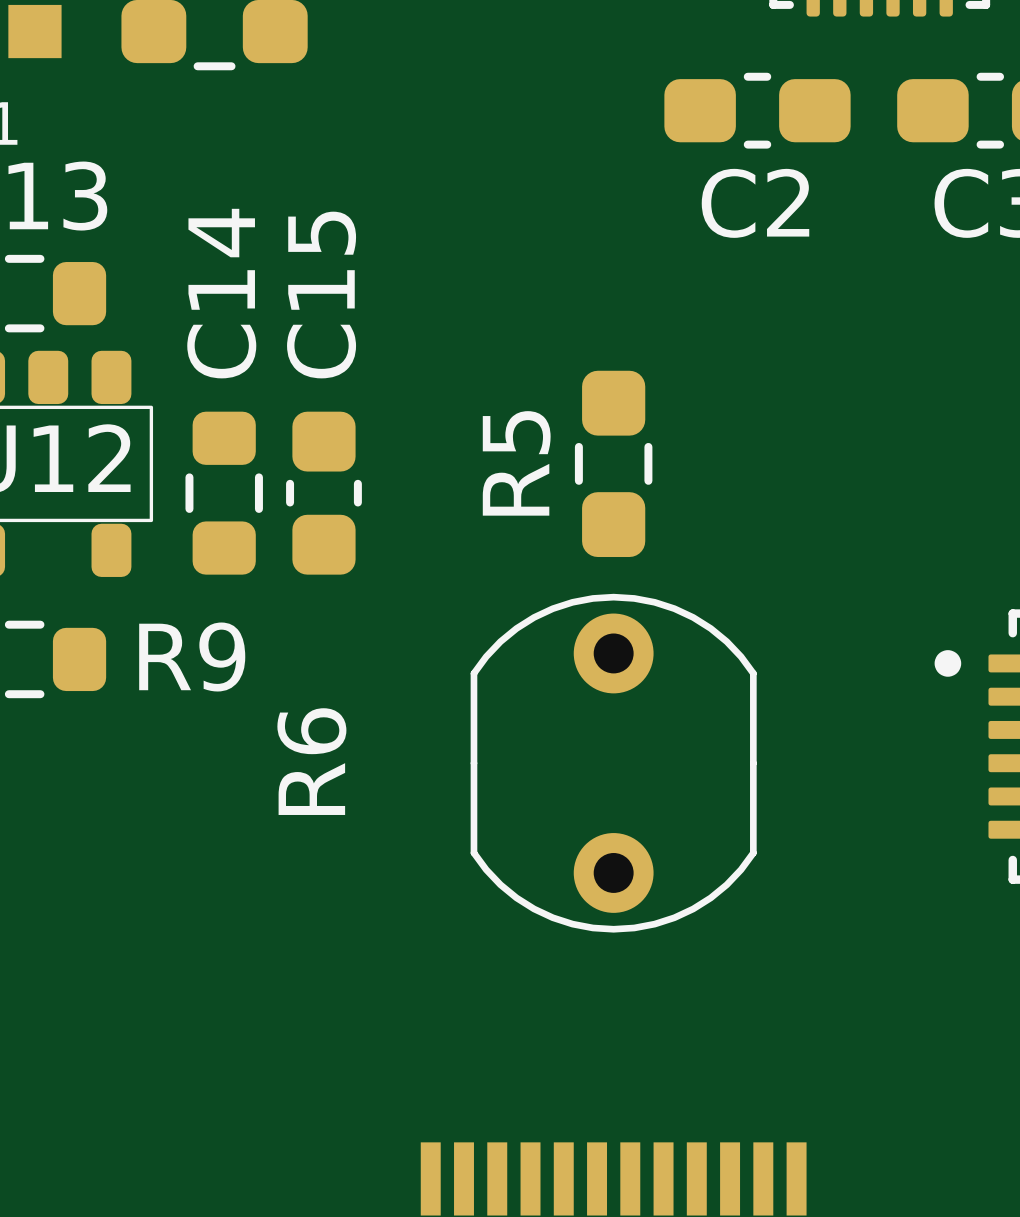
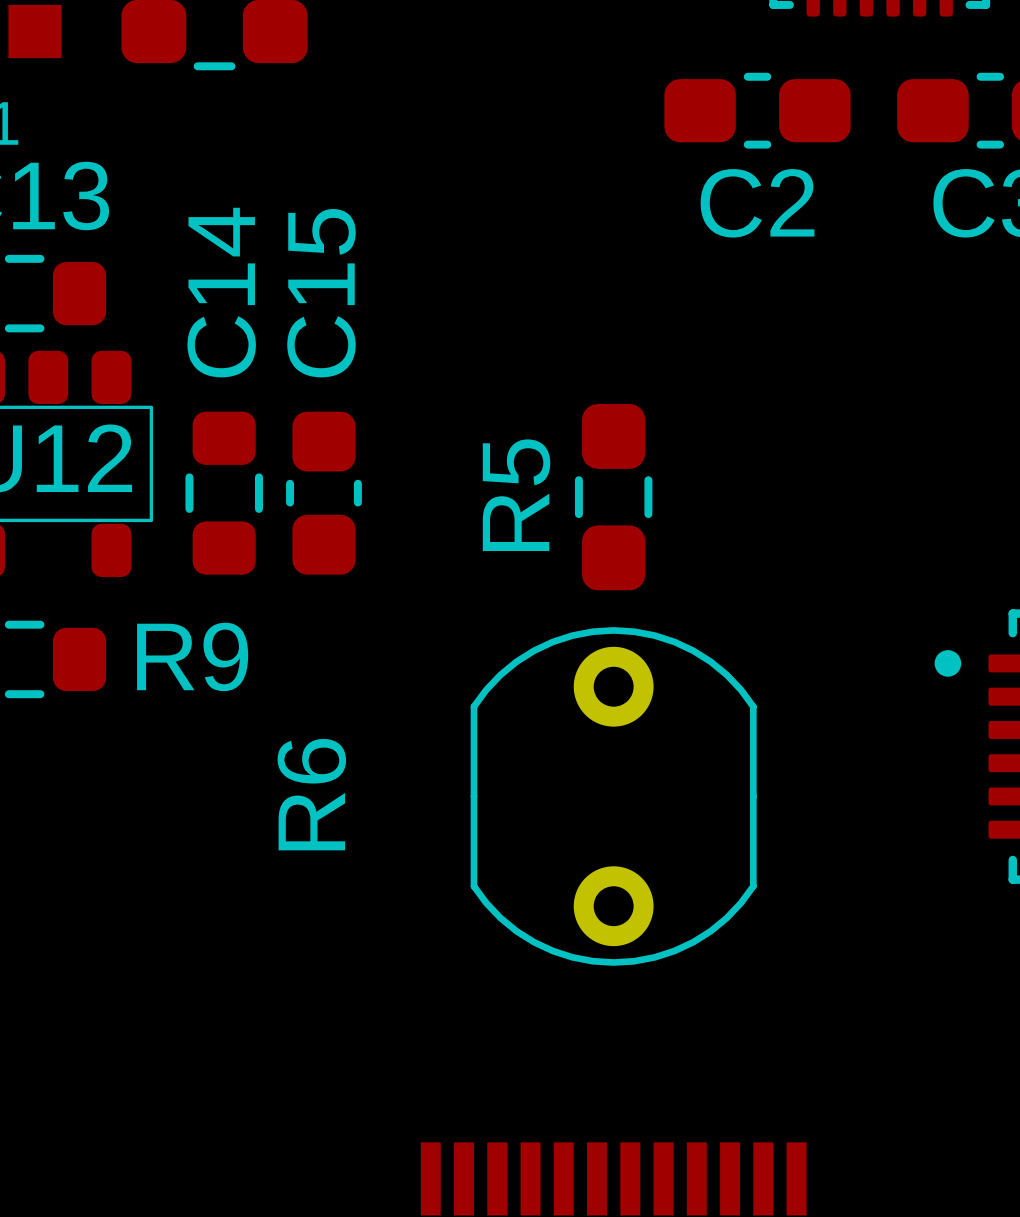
R5 position: (613, 463) -> (613, 497)
R6 position: (613, 763) -> (613, 796)

